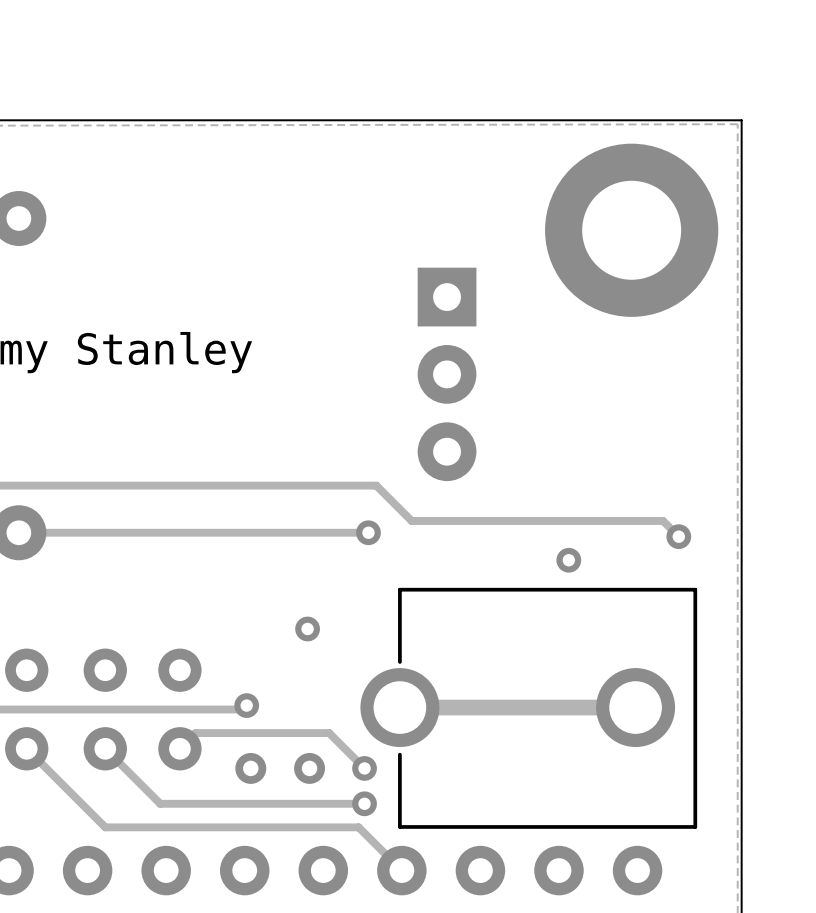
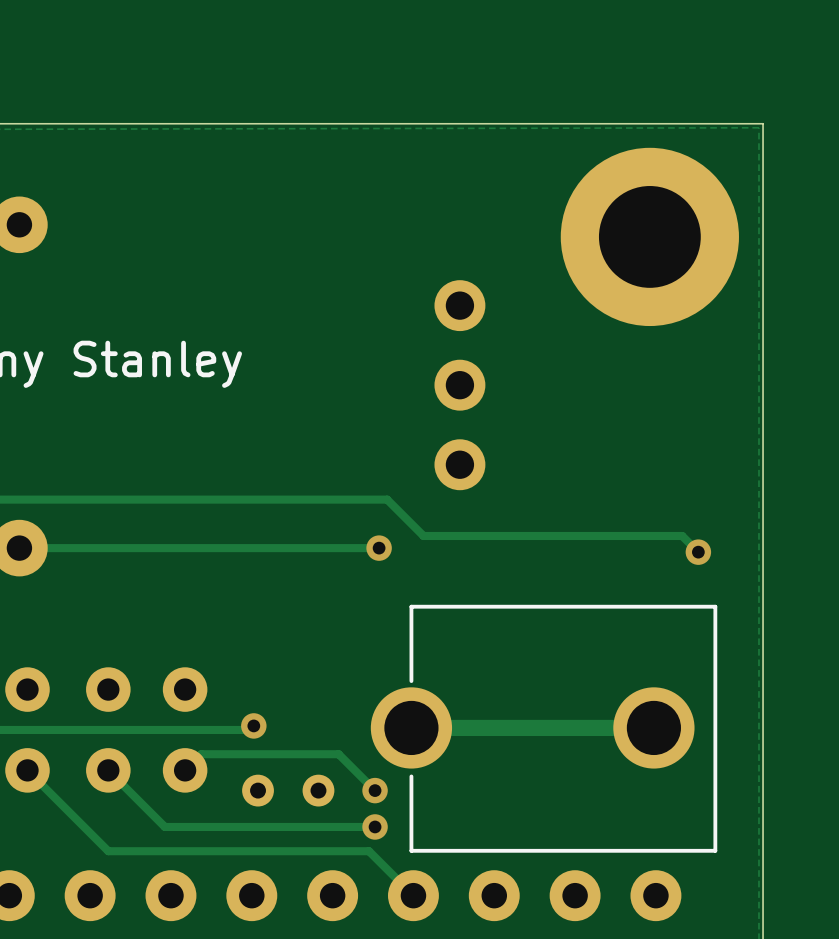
part footprint: [417, 267, 477, 482] -> [434, 280, 486, 491]
via: (568, 560) -> none
via: (307, 628) -> none

